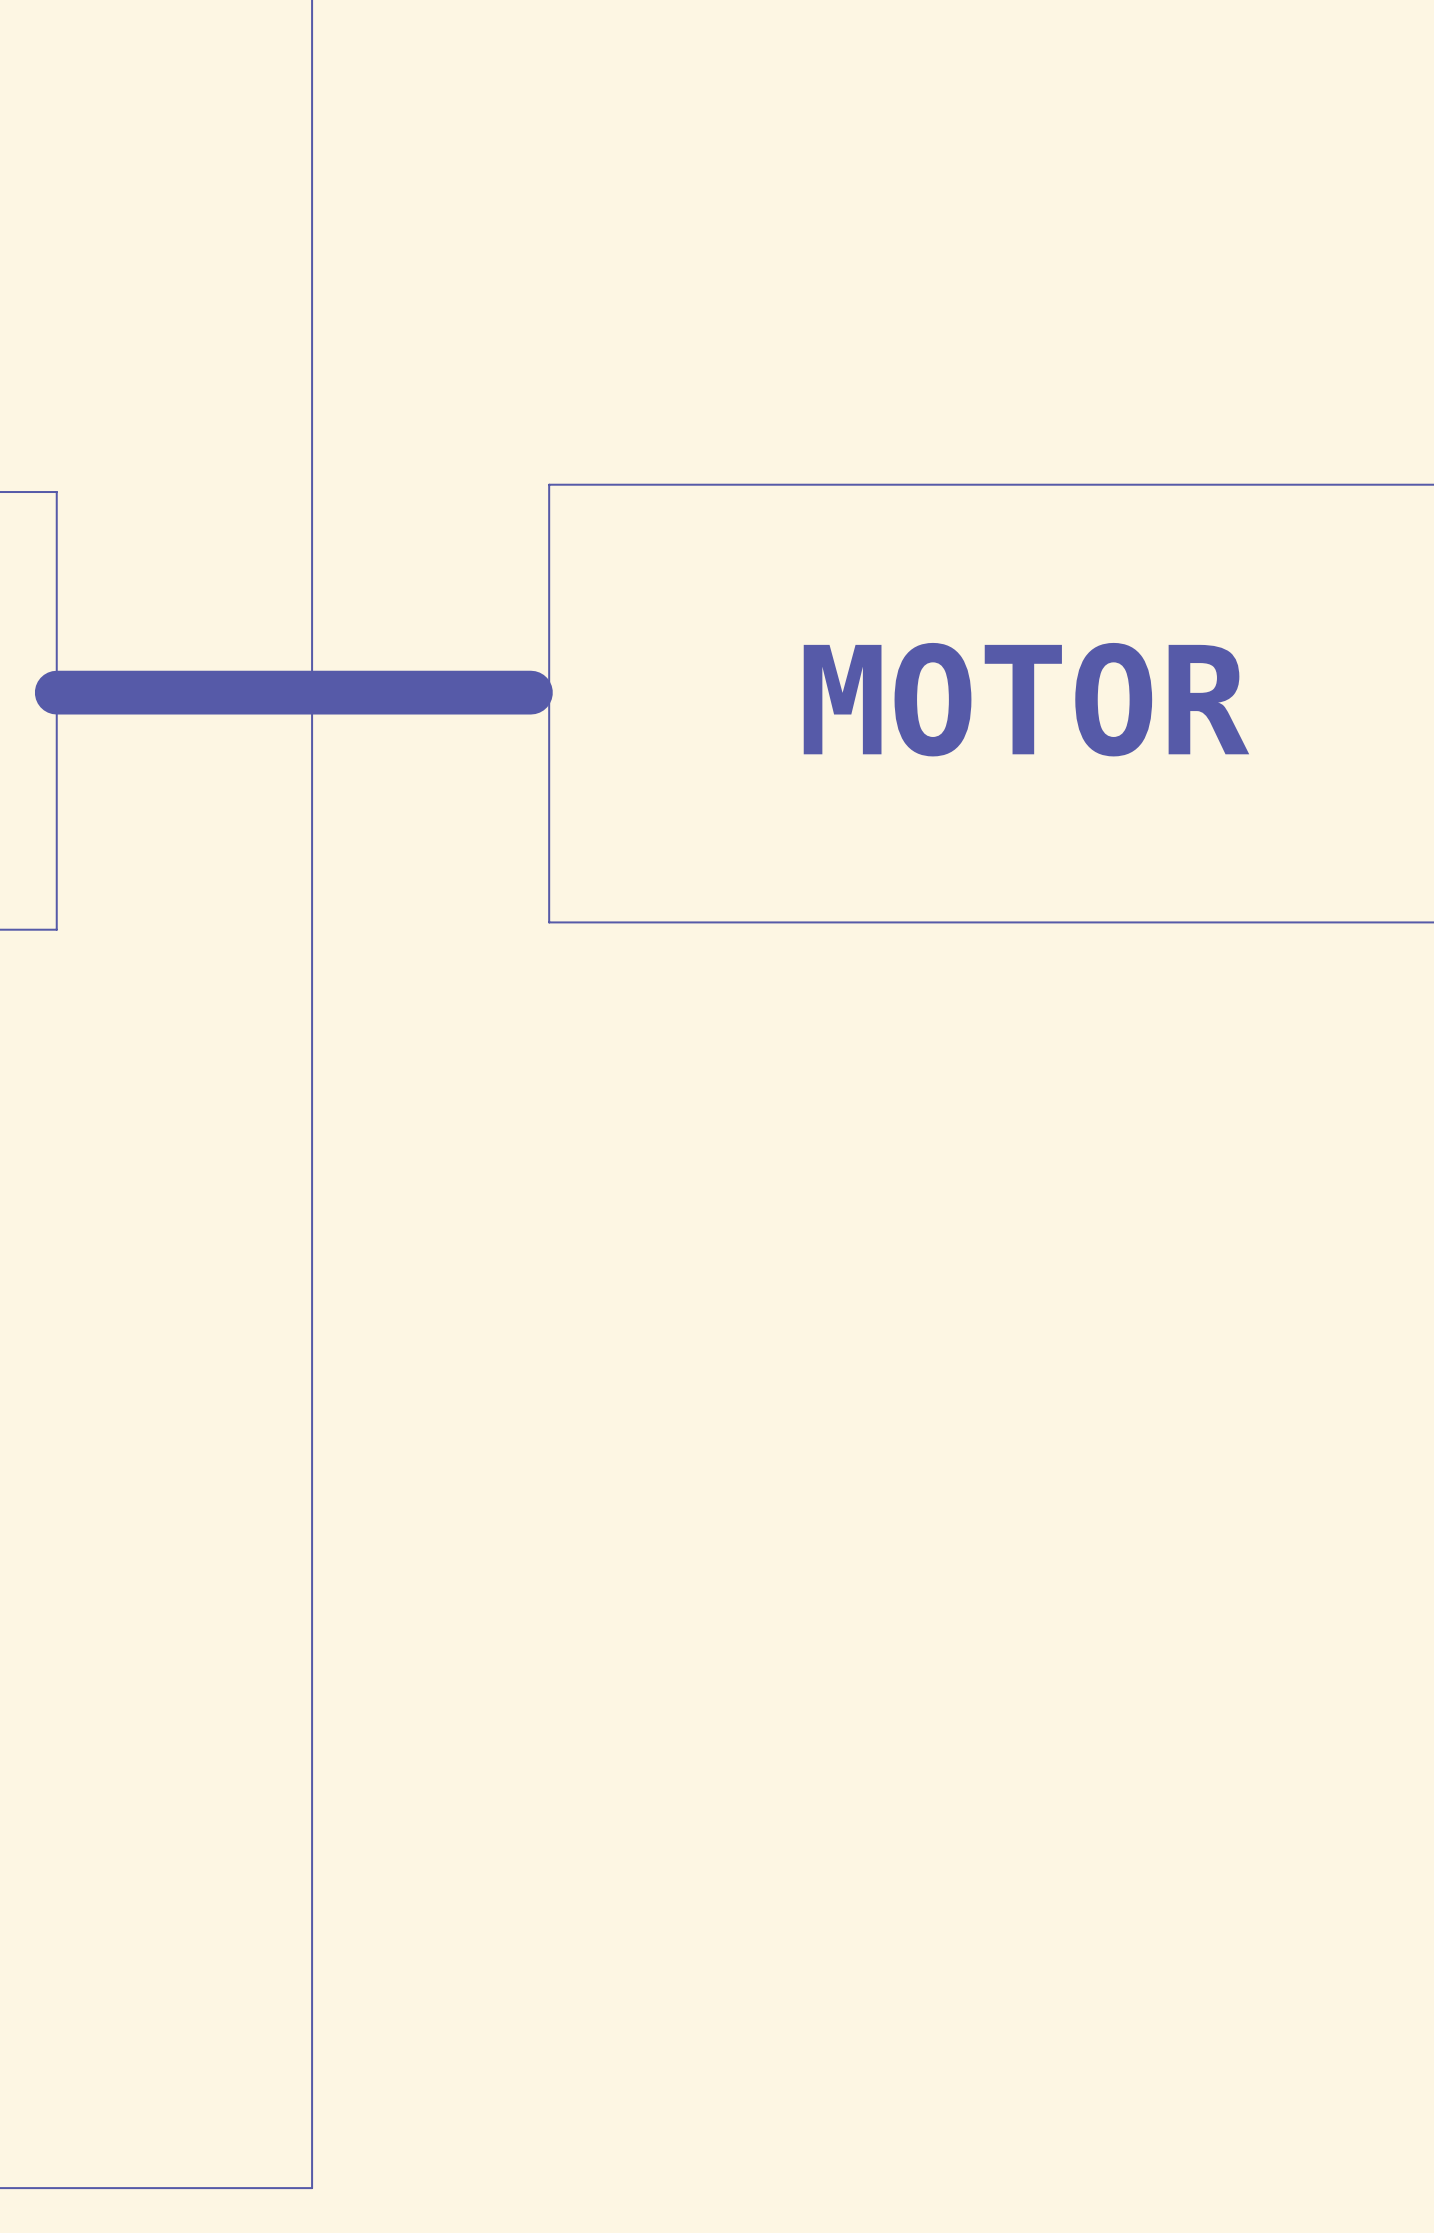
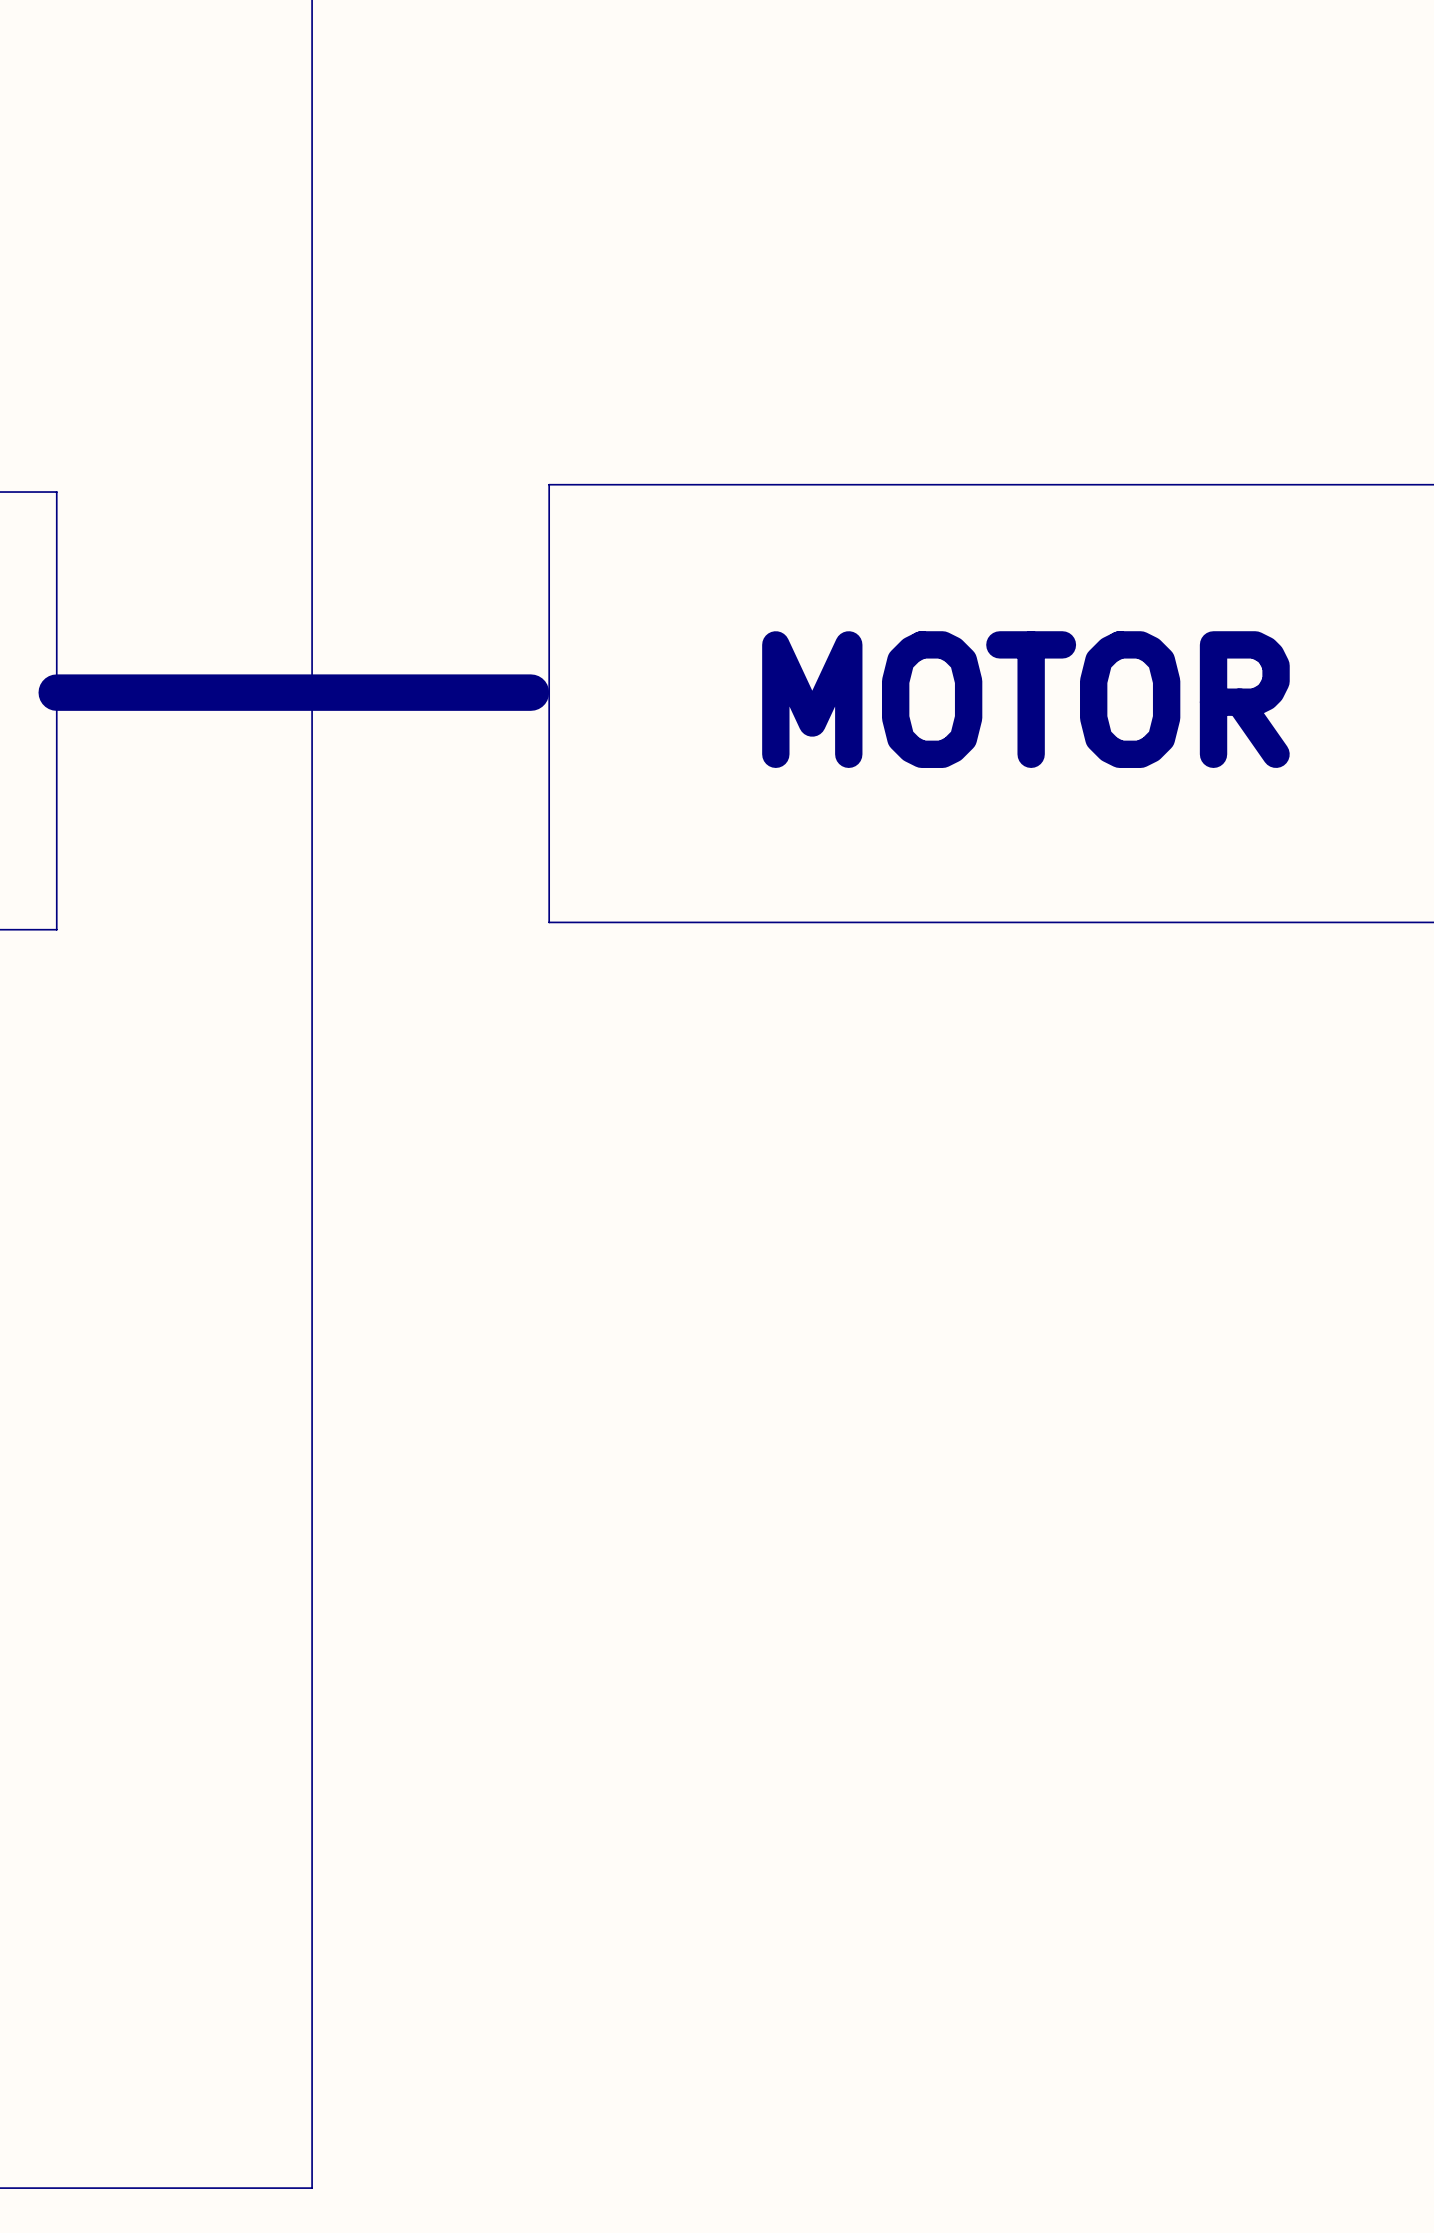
line width: thick (56, 692) (530, 692) -> thin (56, 692) (530, 692)

